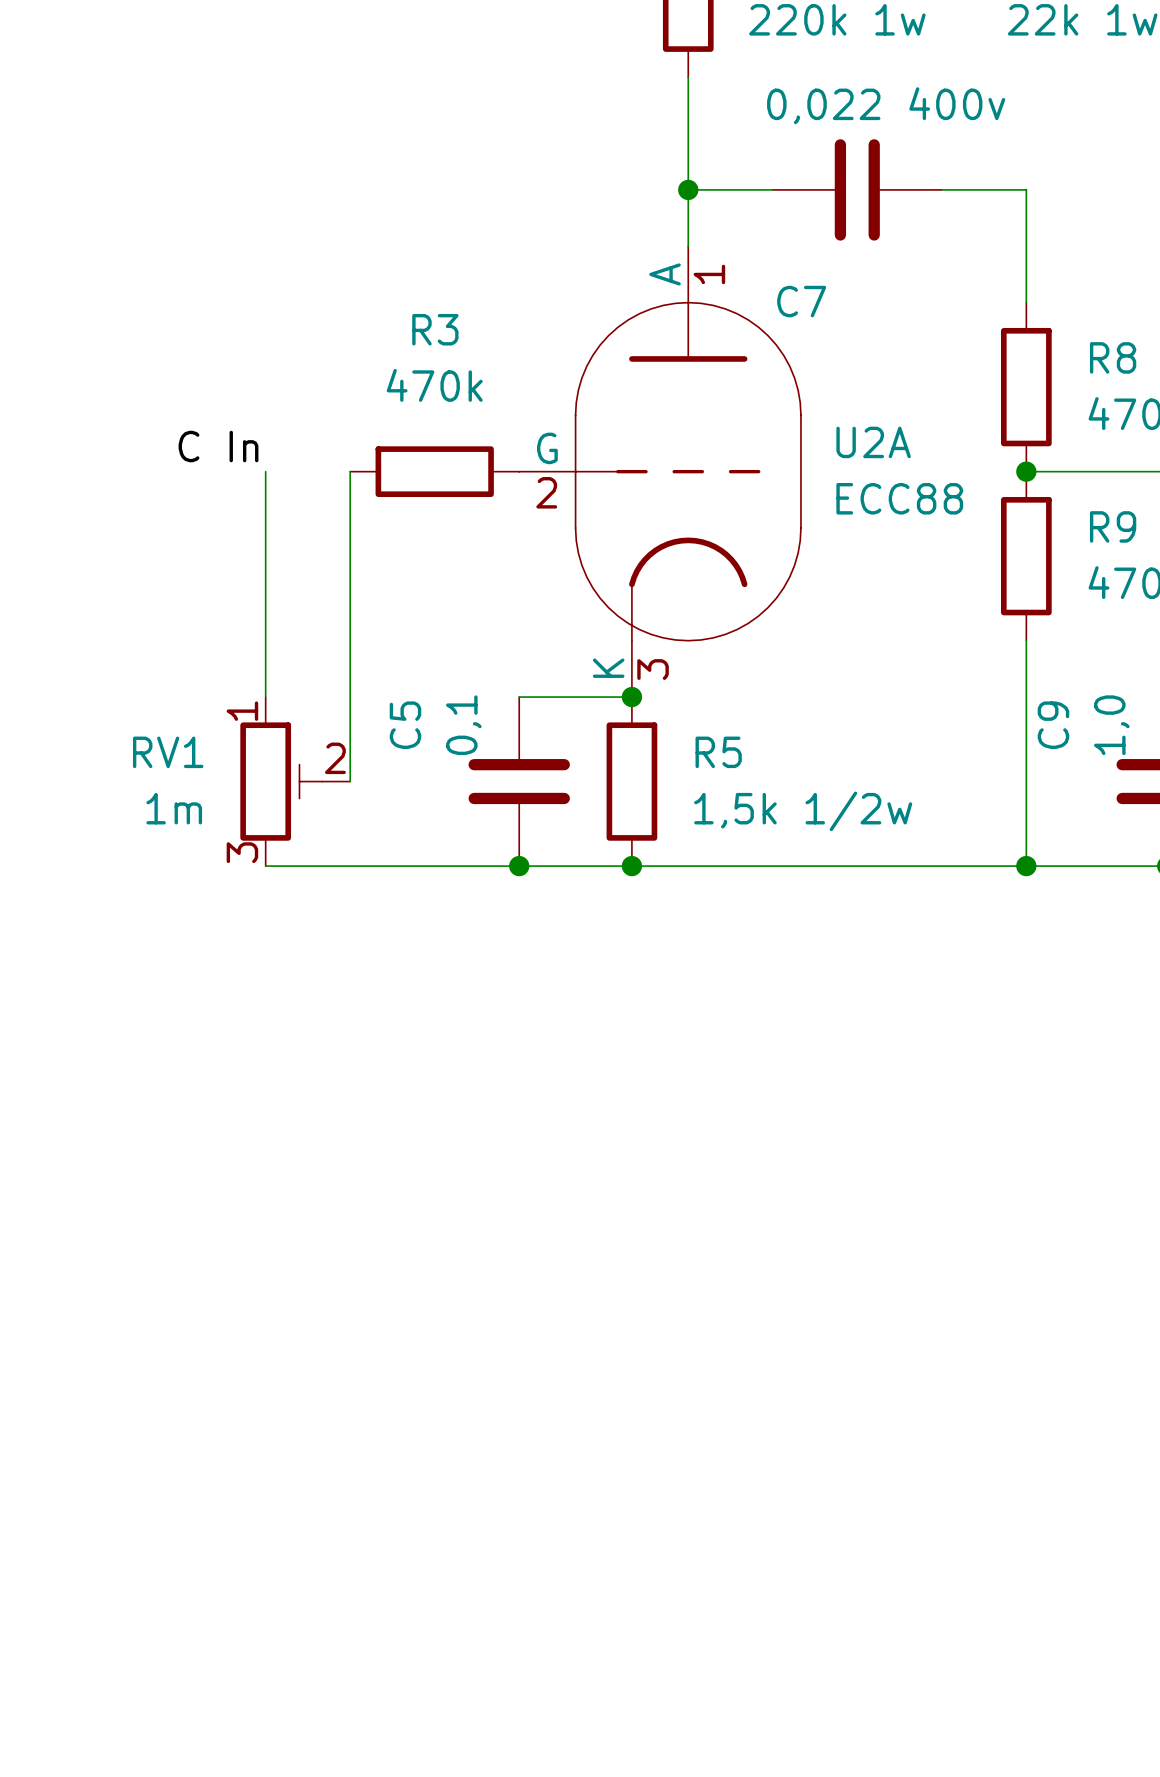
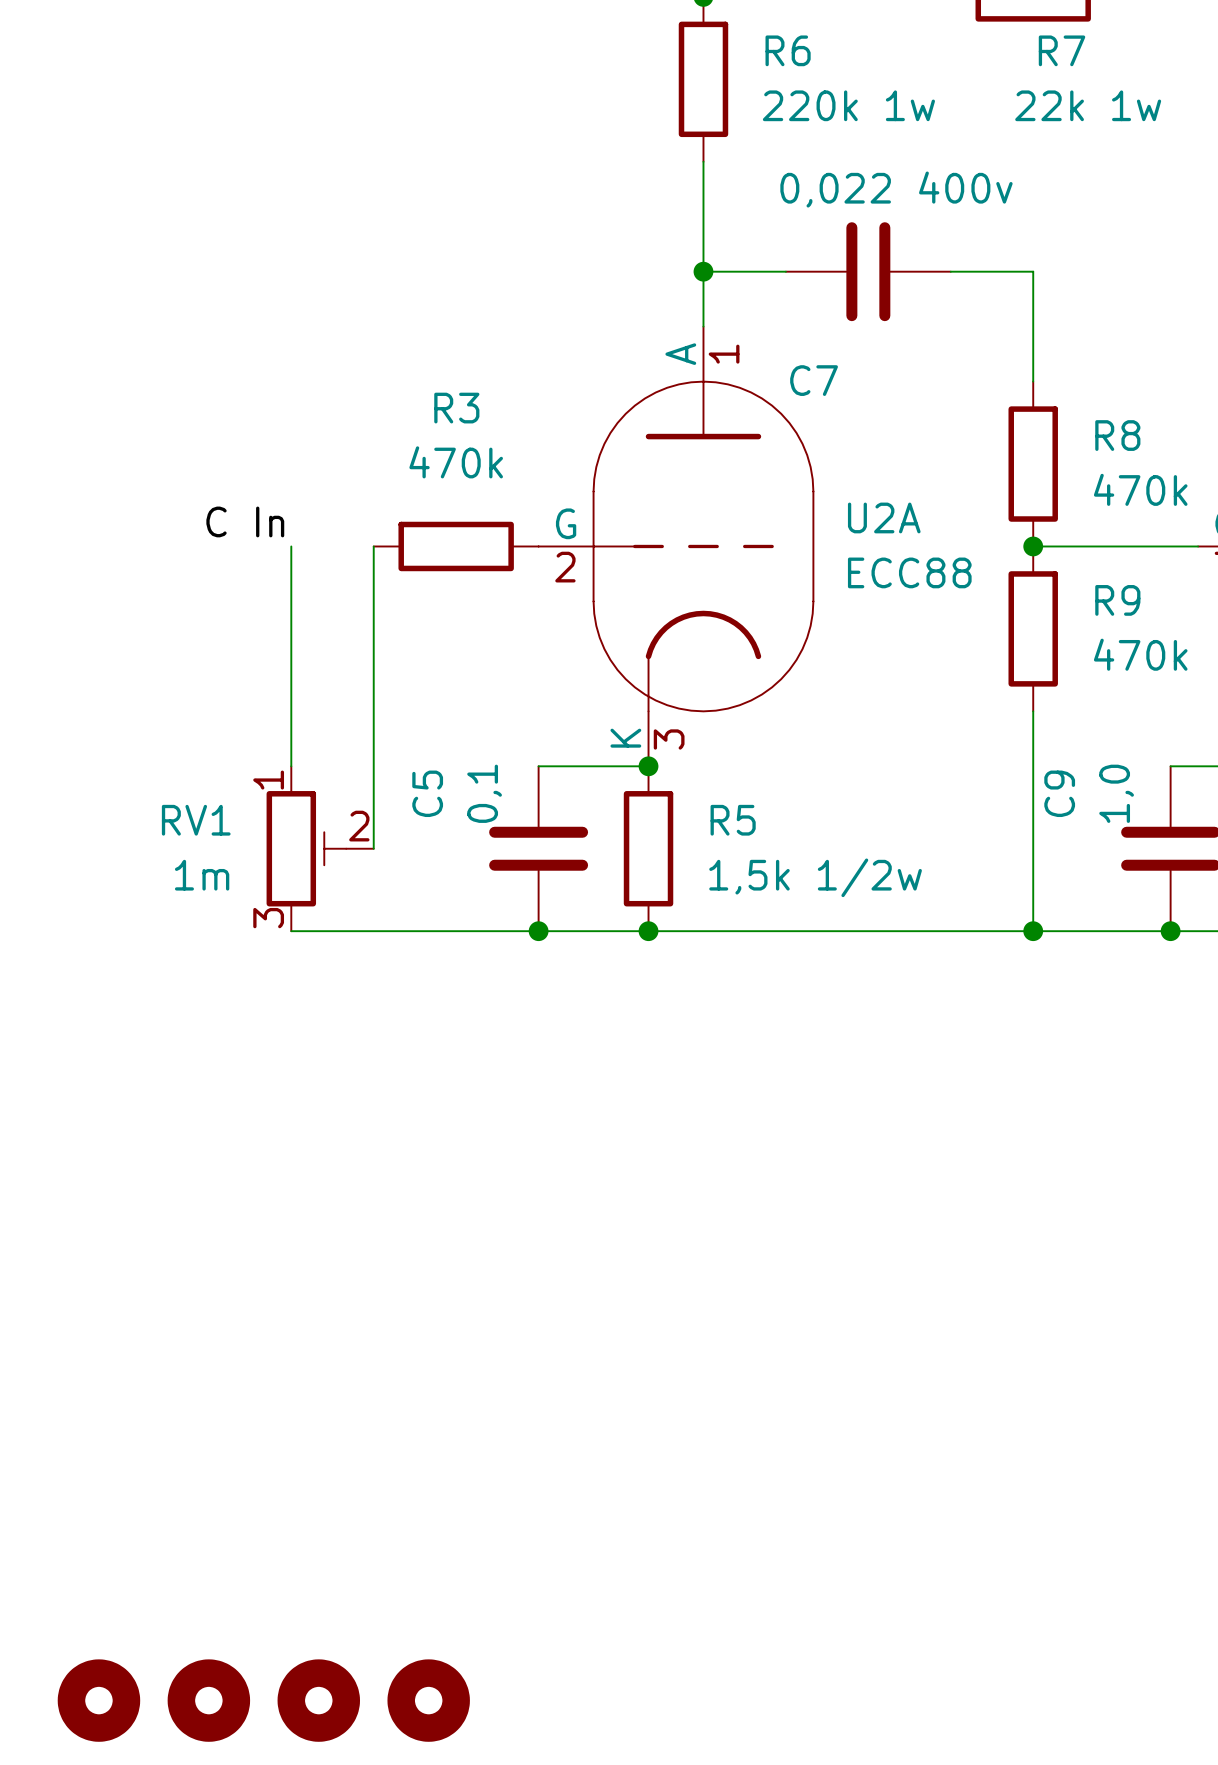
part: none -> (98, 1700)
part: none -> (208, 1700)
part: none -> (318, 1700)
part: none -> (428, 1700)

